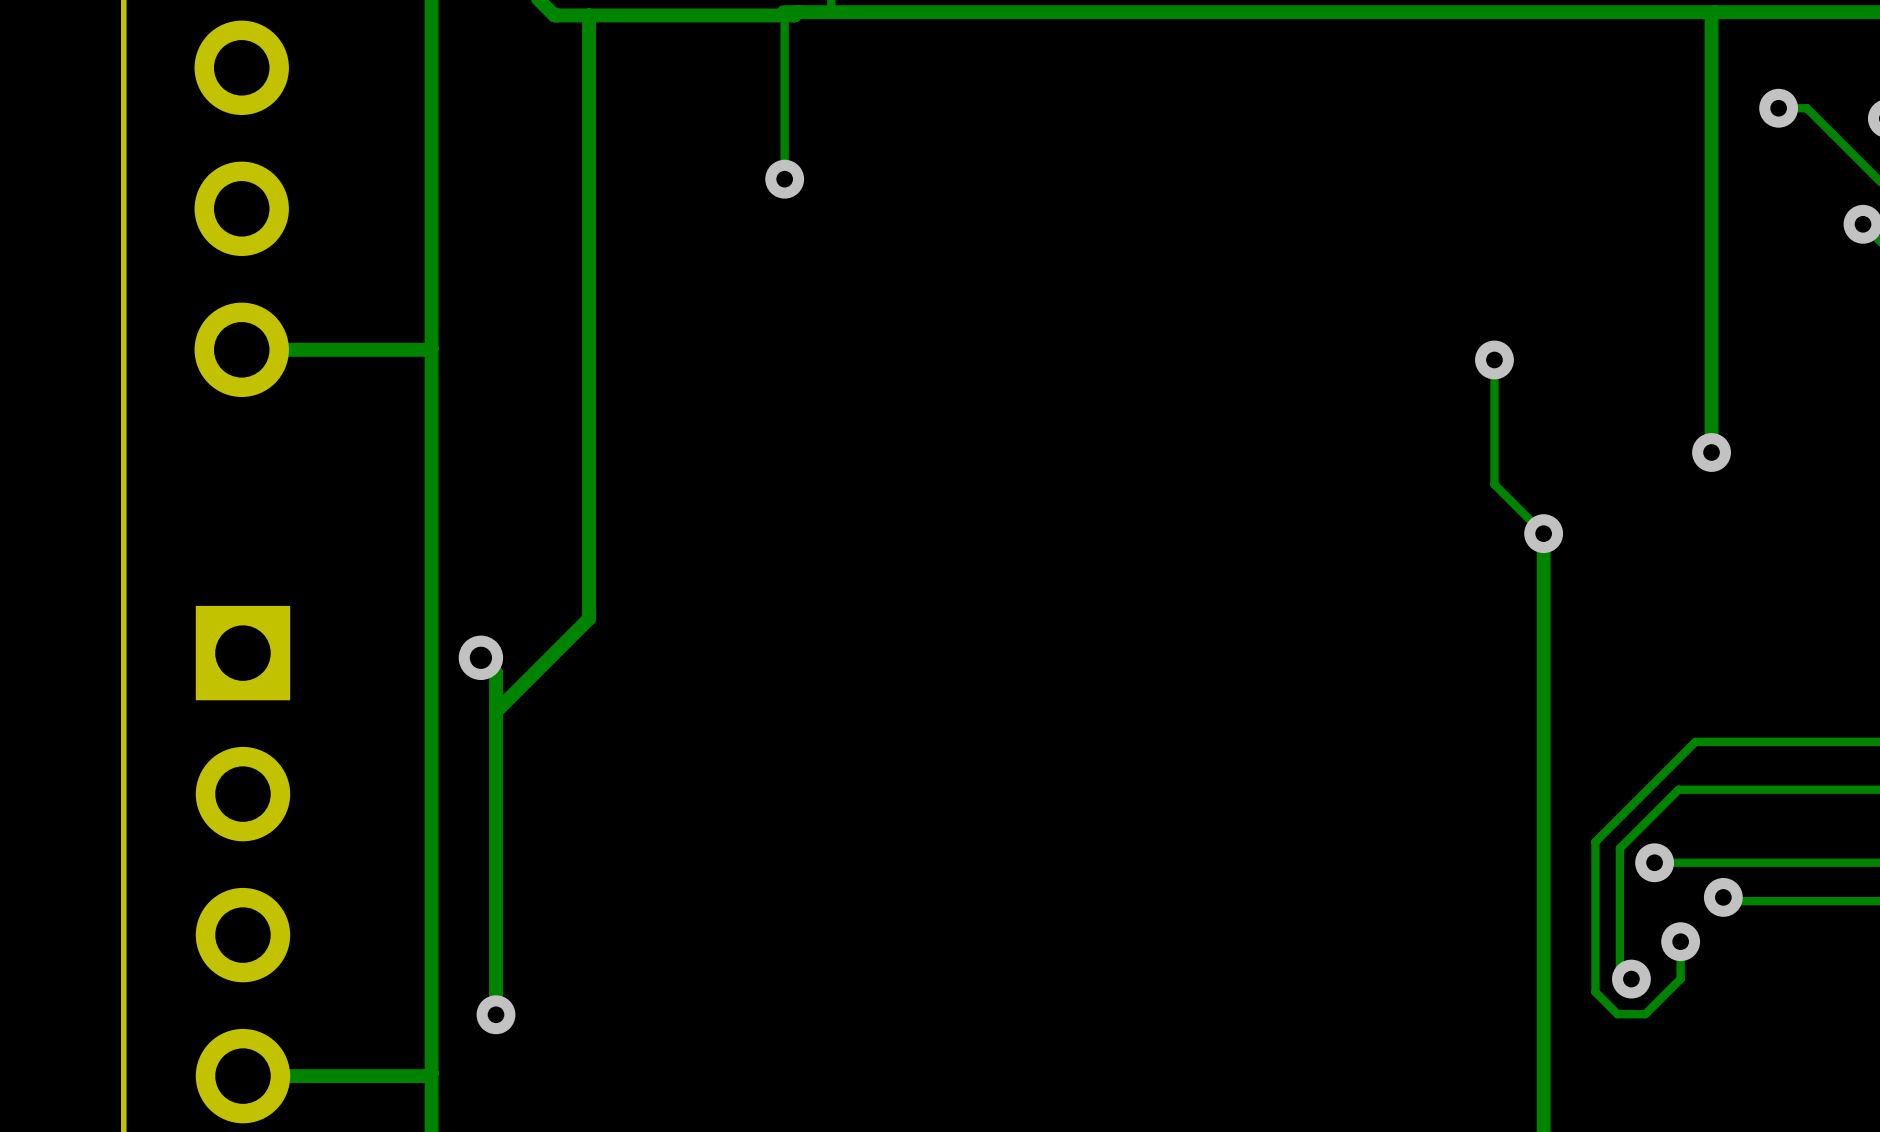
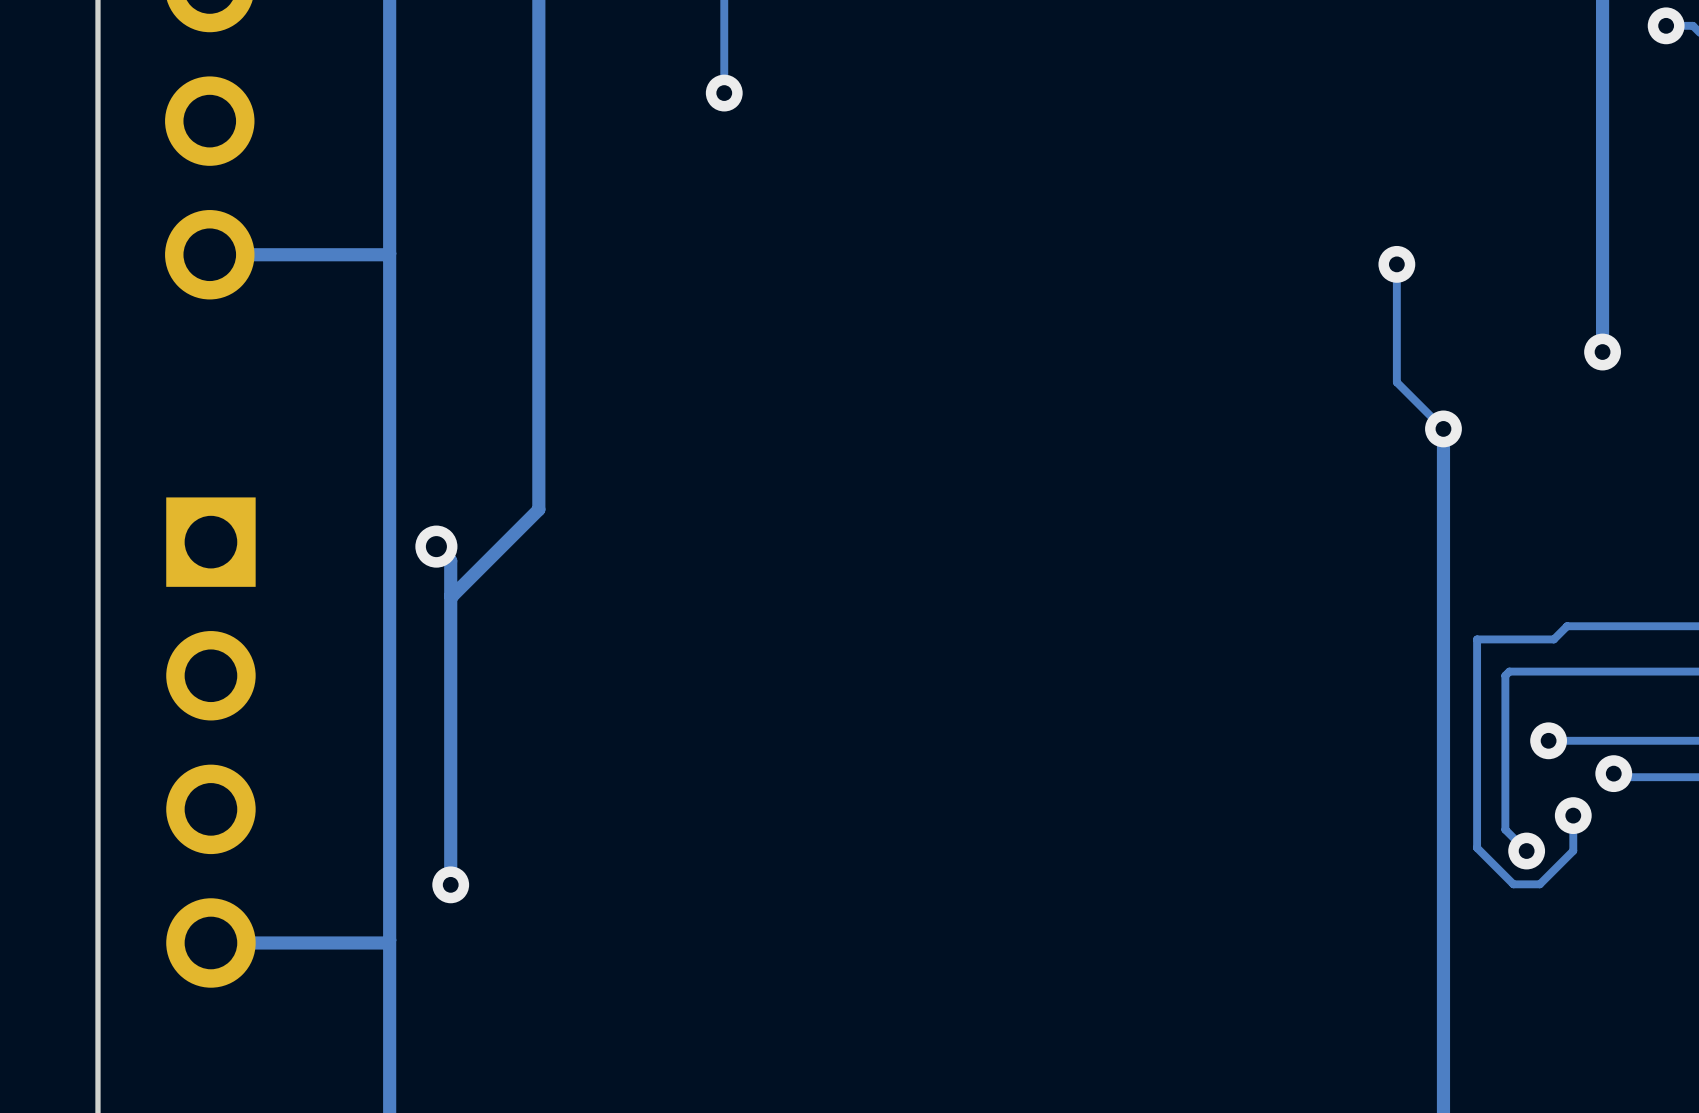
track: (1695, 741) (1595, 841) (1595, 992) -> (1587, 626) (1567, 626) (1553, 639) (1477, 639) (1477, 847) (1492, 863)
track: (1678, 789) (1619, 848) (1619, 967) -> (1571, 671) (1509, 671) (1505, 675) (1505, 829) (1515, 840)

